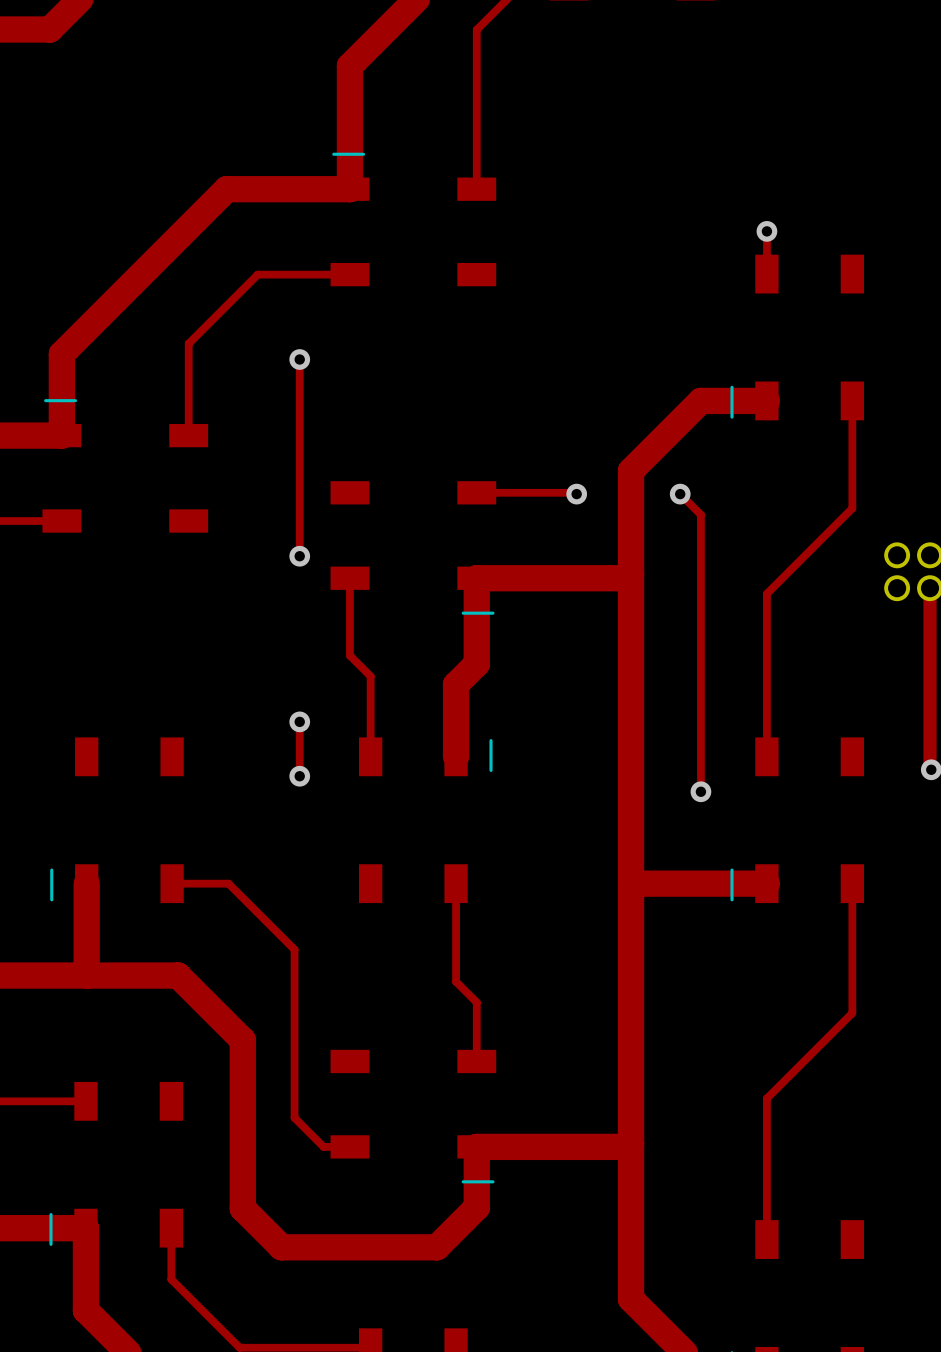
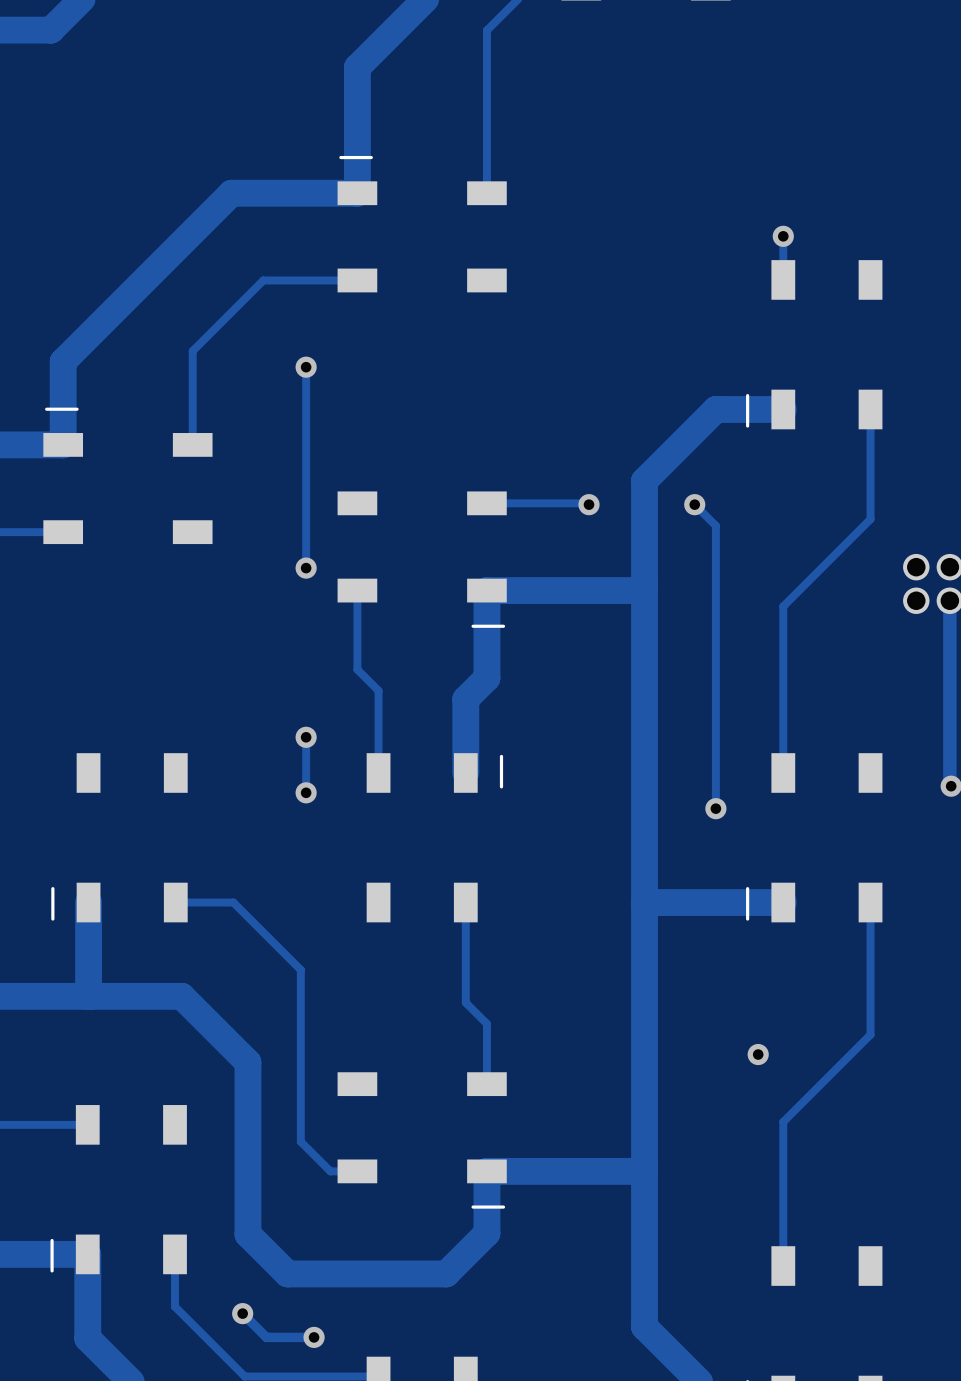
via: none -> (758, 1054)
track: none -> (242, 1313) (266, 1337) (314, 1337)
via: none -> (242, 1313)
via: none -> (314, 1337)

